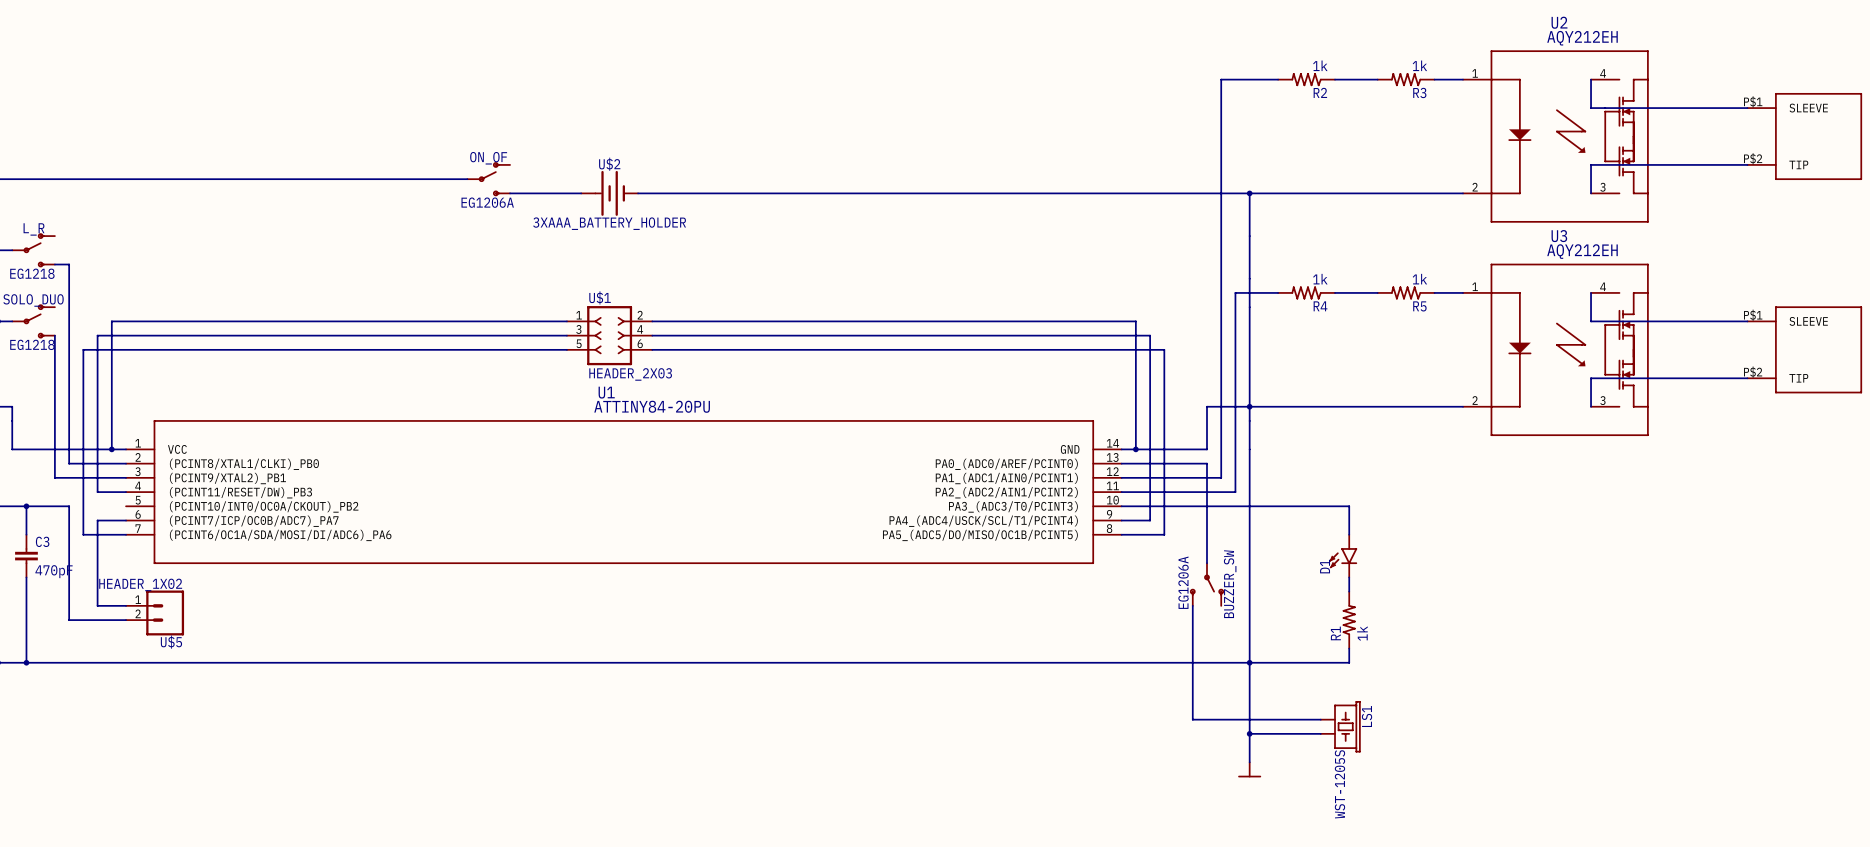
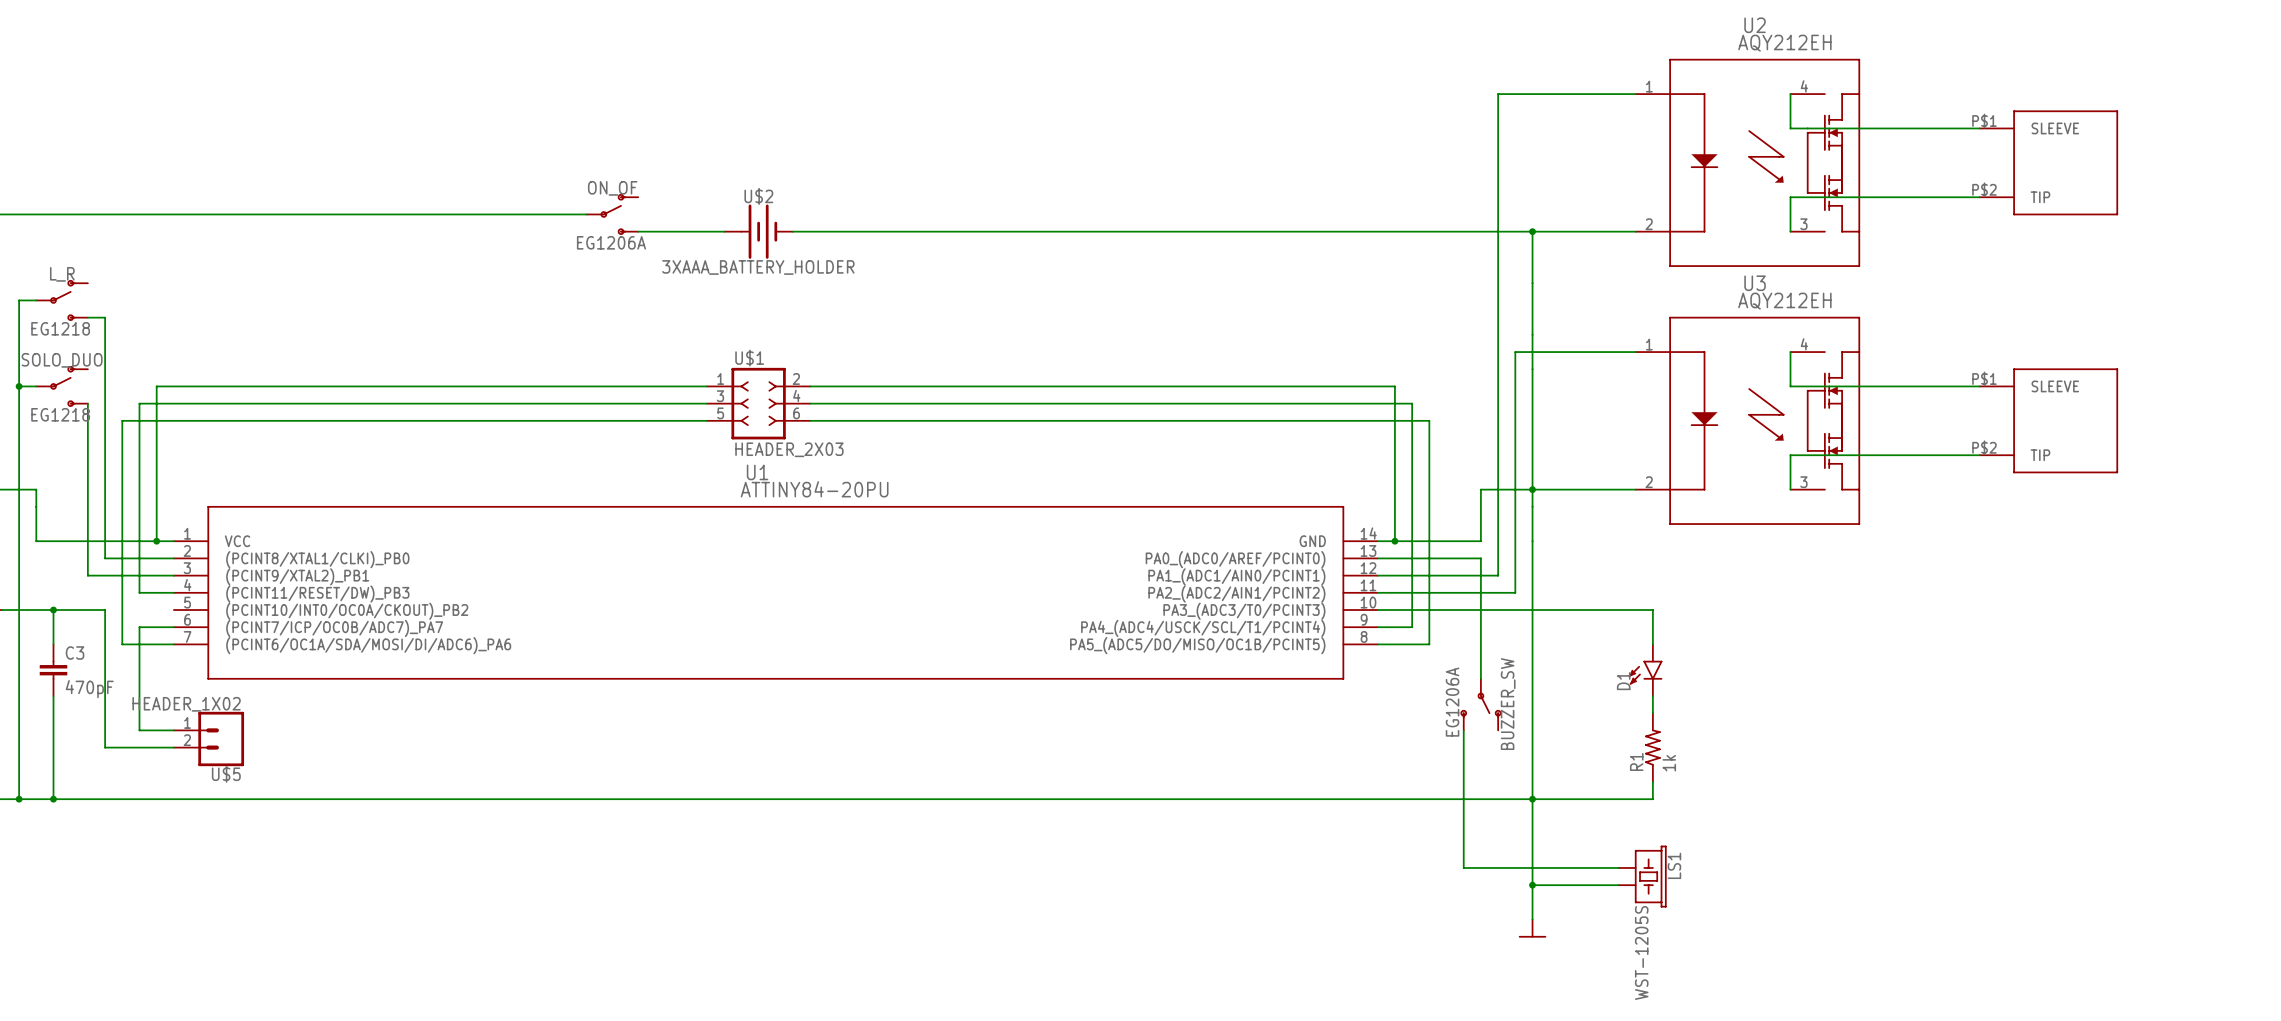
R2: 1k (1306, 79) -> none
R3: 1k (1406, 79) -> none
wire: (1434, 79) (1463, 79) -> none
wire: (1591, 79) (1591, 108) -> (1790, 94) (1790, 128) (1945, 128)
wire: (1619, 108) (1747, 108) -> none
U2 position: (1555, 136) -> (1747, 162)
part: none -> (2048, 162)
part: (1804, 136) -> none
wire: (1591, 164) (1591, 193) -> (1945, 197) (1790, 197) (1790, 231)
wire: (1619, 164) (1747, 164) -> none
wire: (1335, 193) (1463, 193) -> none
R4: 1k (1306, 292) -> none
R5: 1k (1406, 292) -> none
wire: (1434, 292) (1463, 292) -> none
wire: (1591, 292) (1591, 321) -> (1790, 352) (1790, 386) (1945, 386)
wire: (1619, 321) (1747, 321) -> none
U3 position: (1555, 349) -> (1747, 420)
part: none -> (2048, 420)
part: (1804, 349) -> none
wire: (1591, 378) (1591, 406) -> (1945, 455) (1790, 455) (1790, 489)
wire: (1619, 378) (1747, 378) -> none
wire: (1335, 406) (1463, 406) -> none

